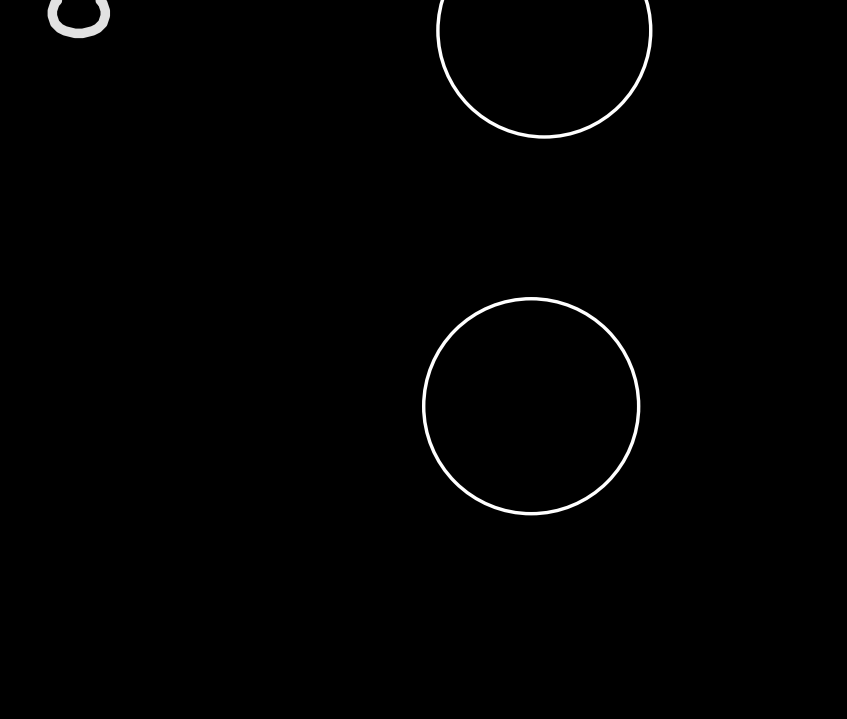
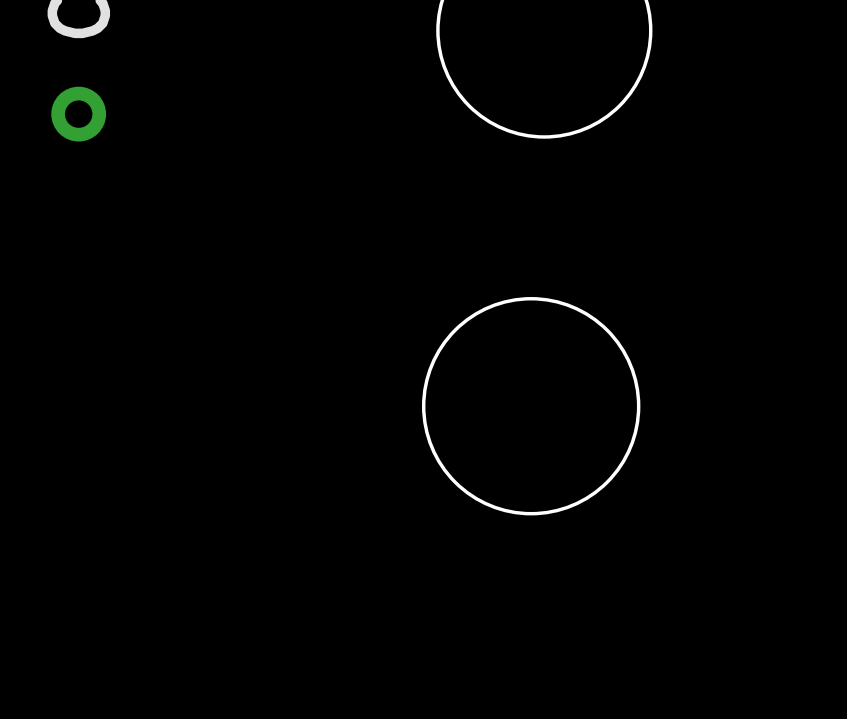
via: none -> (78, 114)

